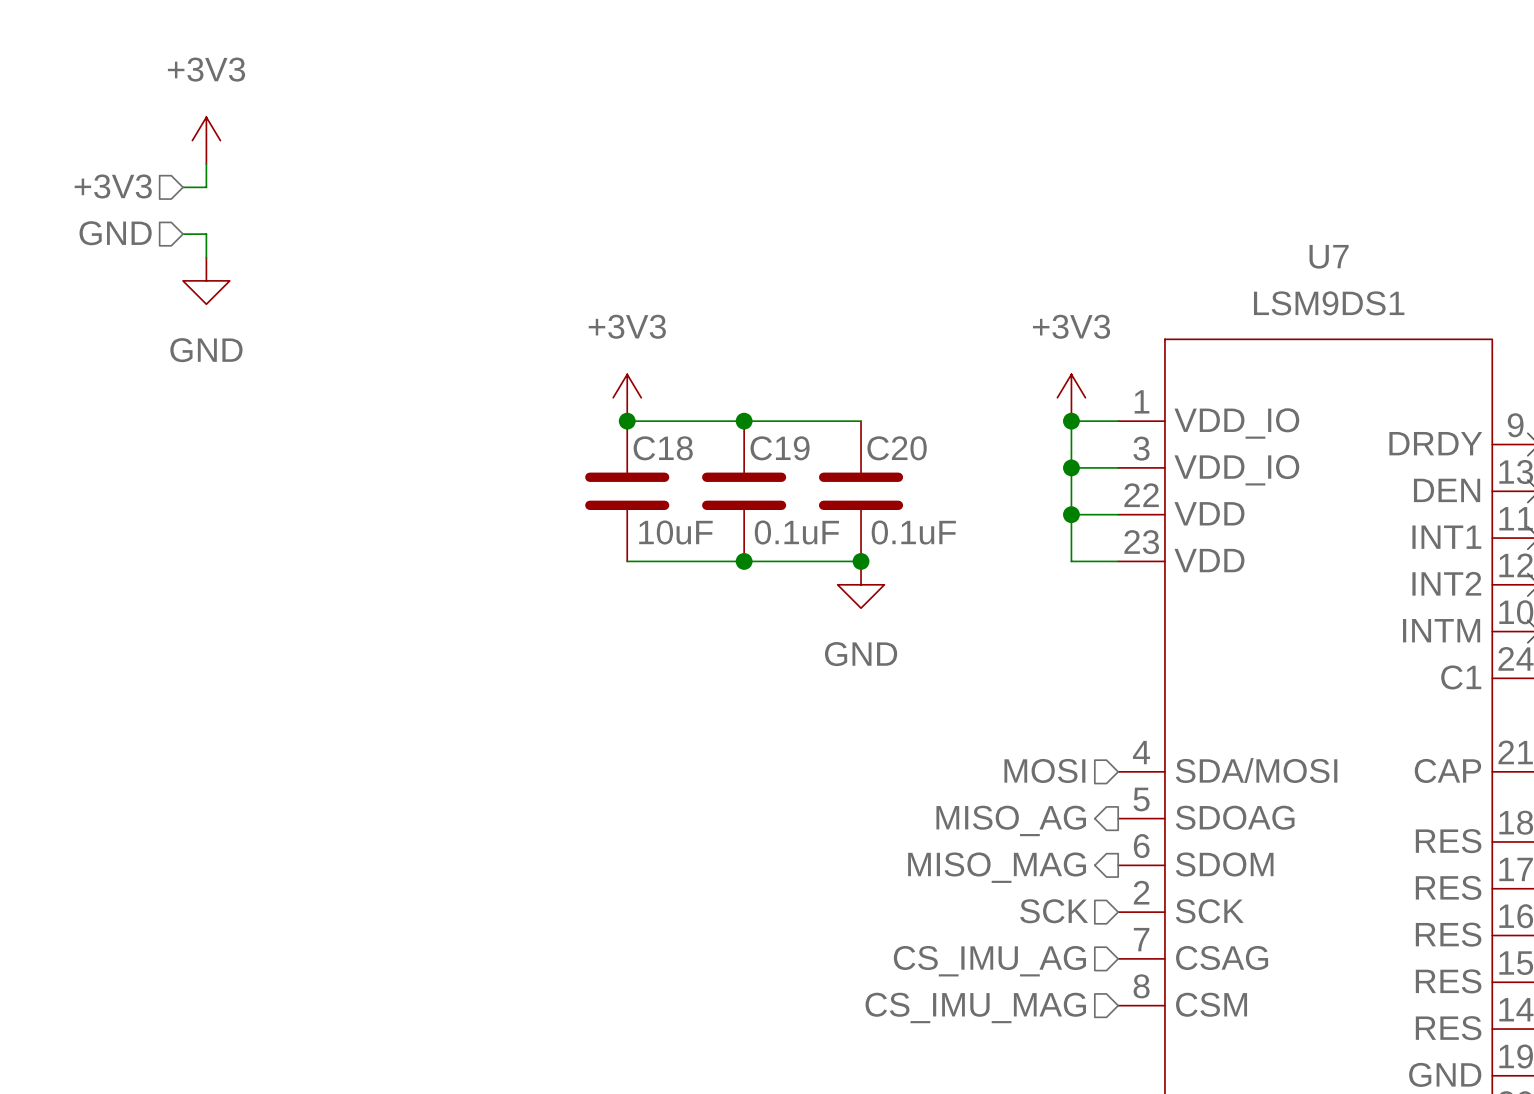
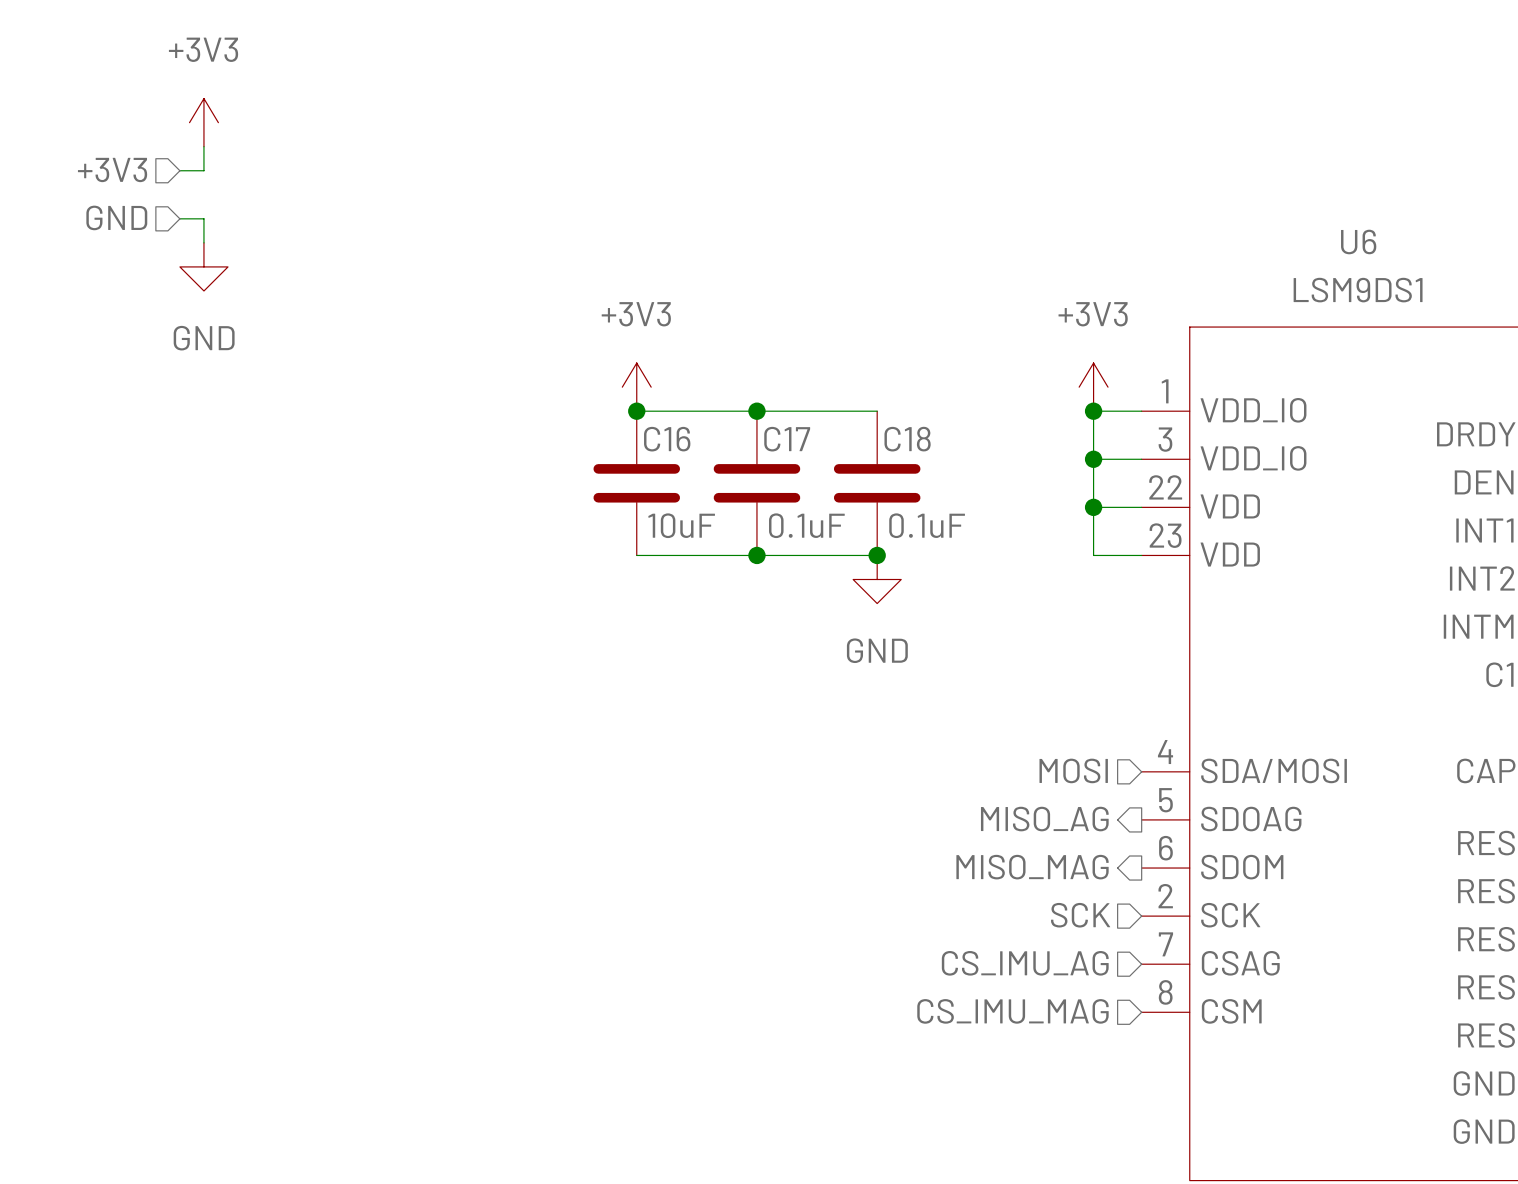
U7 name: U7 (1329, 256) -> U6 (1358, 241)
C18 name: C18 (663, 448) -> C16 (667, 439)
C19 name: C19 (780, 448) -> C17 (787, 439)
C20 name: C20 (897, 448) -> C18 (907, 439)

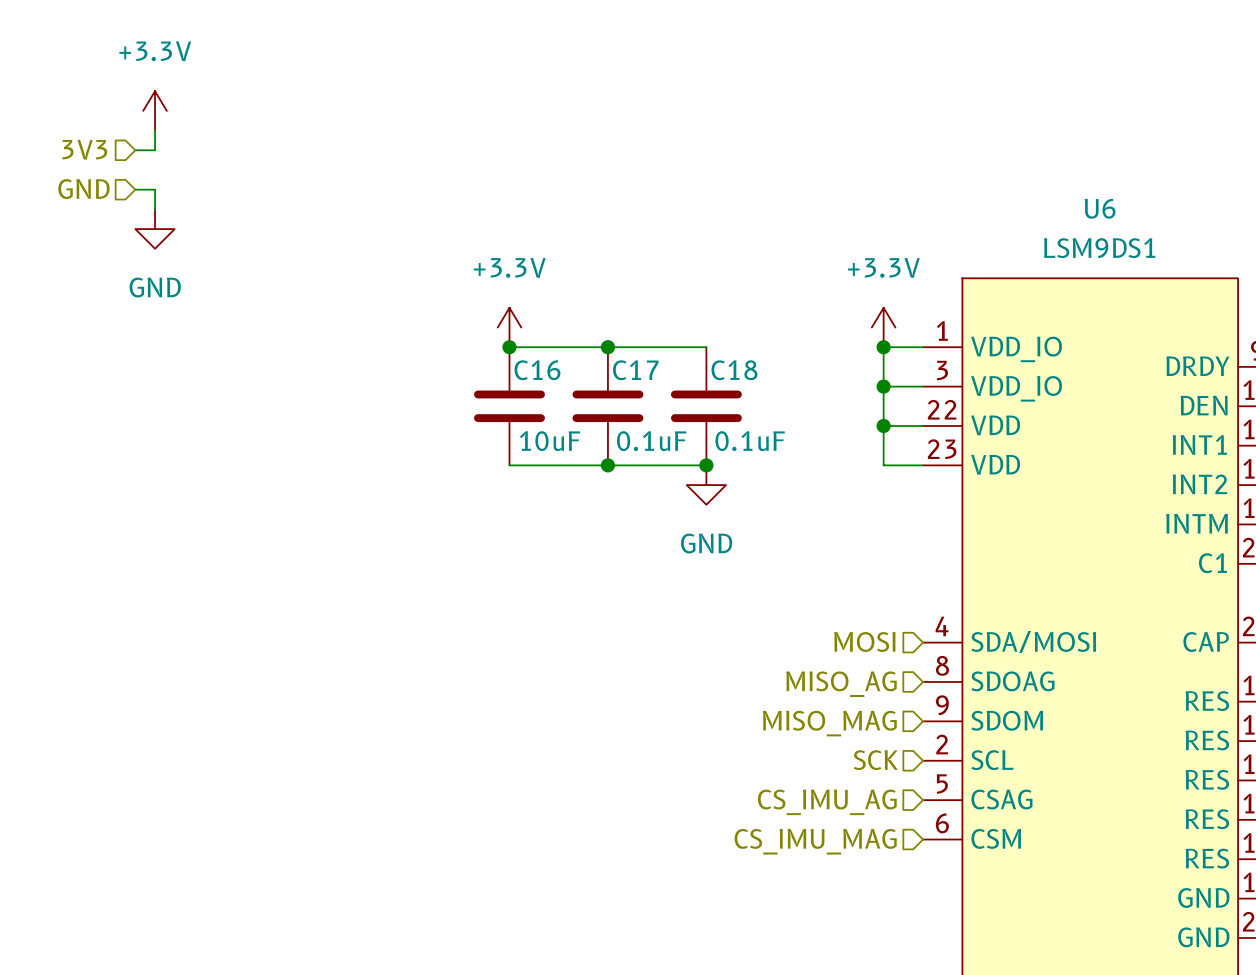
power symbol: +3V3 (203, 122) -> +3.3V (155, 110)
hierarchical label: +3V3 (112, 169) -> 3V3 (84, 149)
power symbol: +3V3 (636, 387) -> +3.3V (509, 327)
power symbol: +3V3 (1093, 387) -> +3.3V (883, 327)
U6 pin number: 5 (1165, 800) -> 8 (942, 665)
hierarchical label shape: output (1044, 819) -> input (841, 684)
U6 pin number: 6 (1165, 848) -> 9 (942, 705)
hierarchical label shape: output (1032, 867) -> input (829, 723)
U6 pin name: SCK (1230, 915) -> SCL (992, 760)
U6 pin number: 7 (1165, 944) -> 5 (942, 784)
U6 pin number: 8 (1165, 992) -> 6 (942, 823)

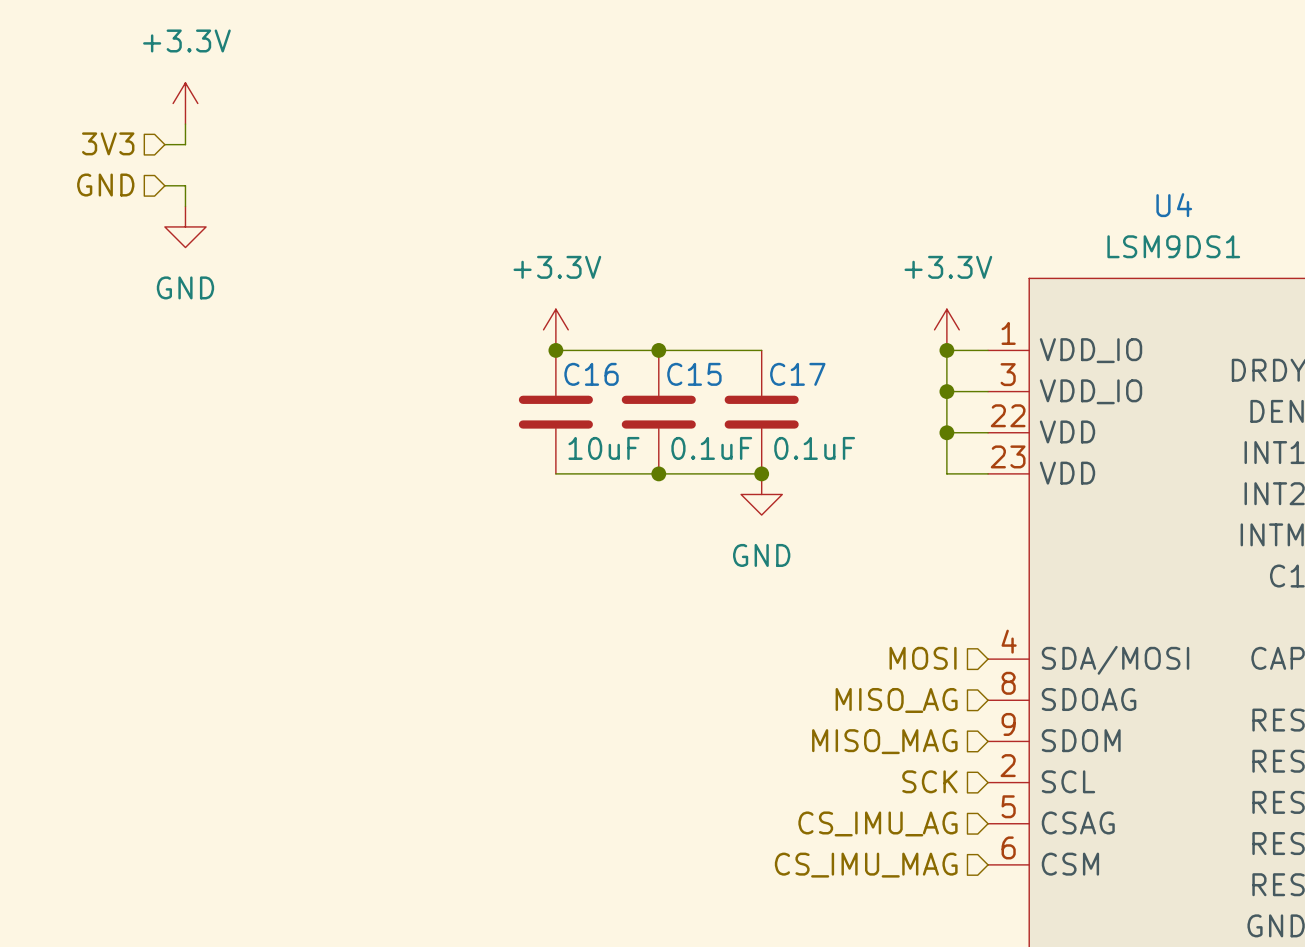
U6 name: U6 (1100, 208) -> U4 (1174, 205)
C17 name: C17 (635, 370) -> C15 (694, 374)
C18 name: C18 (734, 370) -> C17 (797, 374)

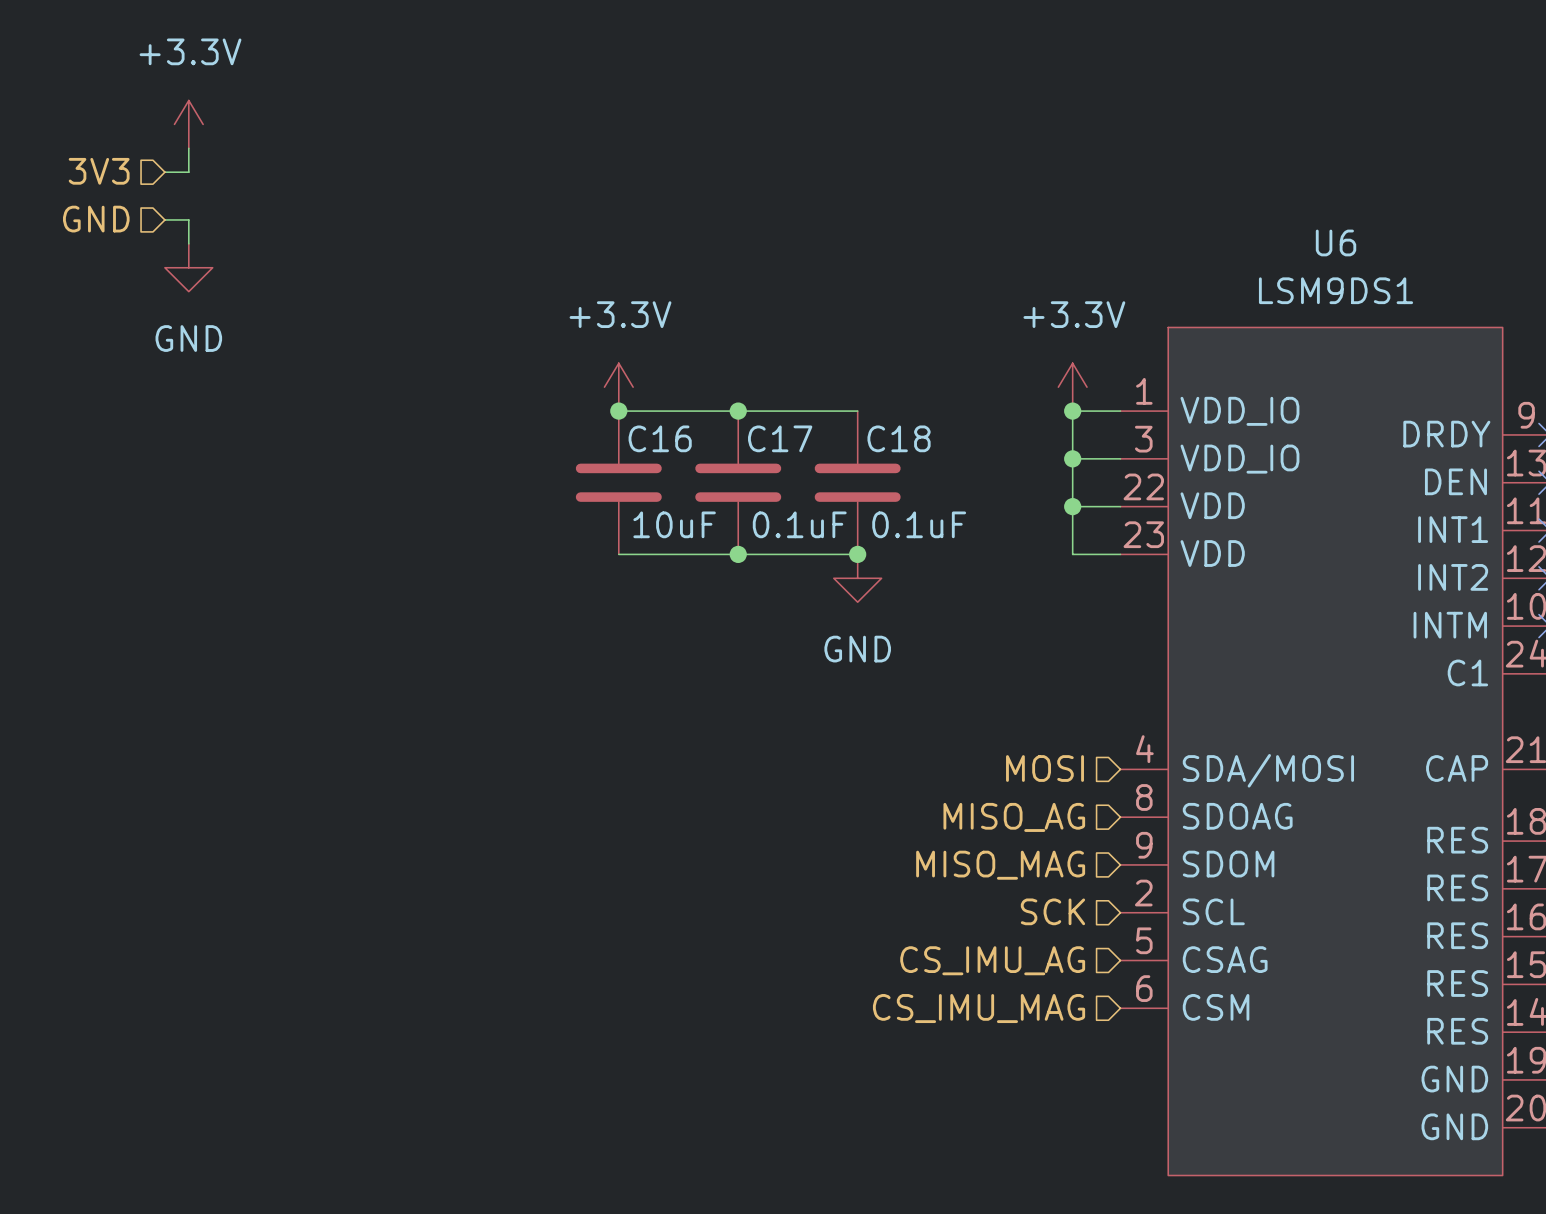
U4 name: U4 (1174, 205) -> U6 (1336, 242)
C15 name: C15 (694, 374) -> C17 (780, 438)
C17 name: C17 (797, 374) -> C18 (899, 438)

